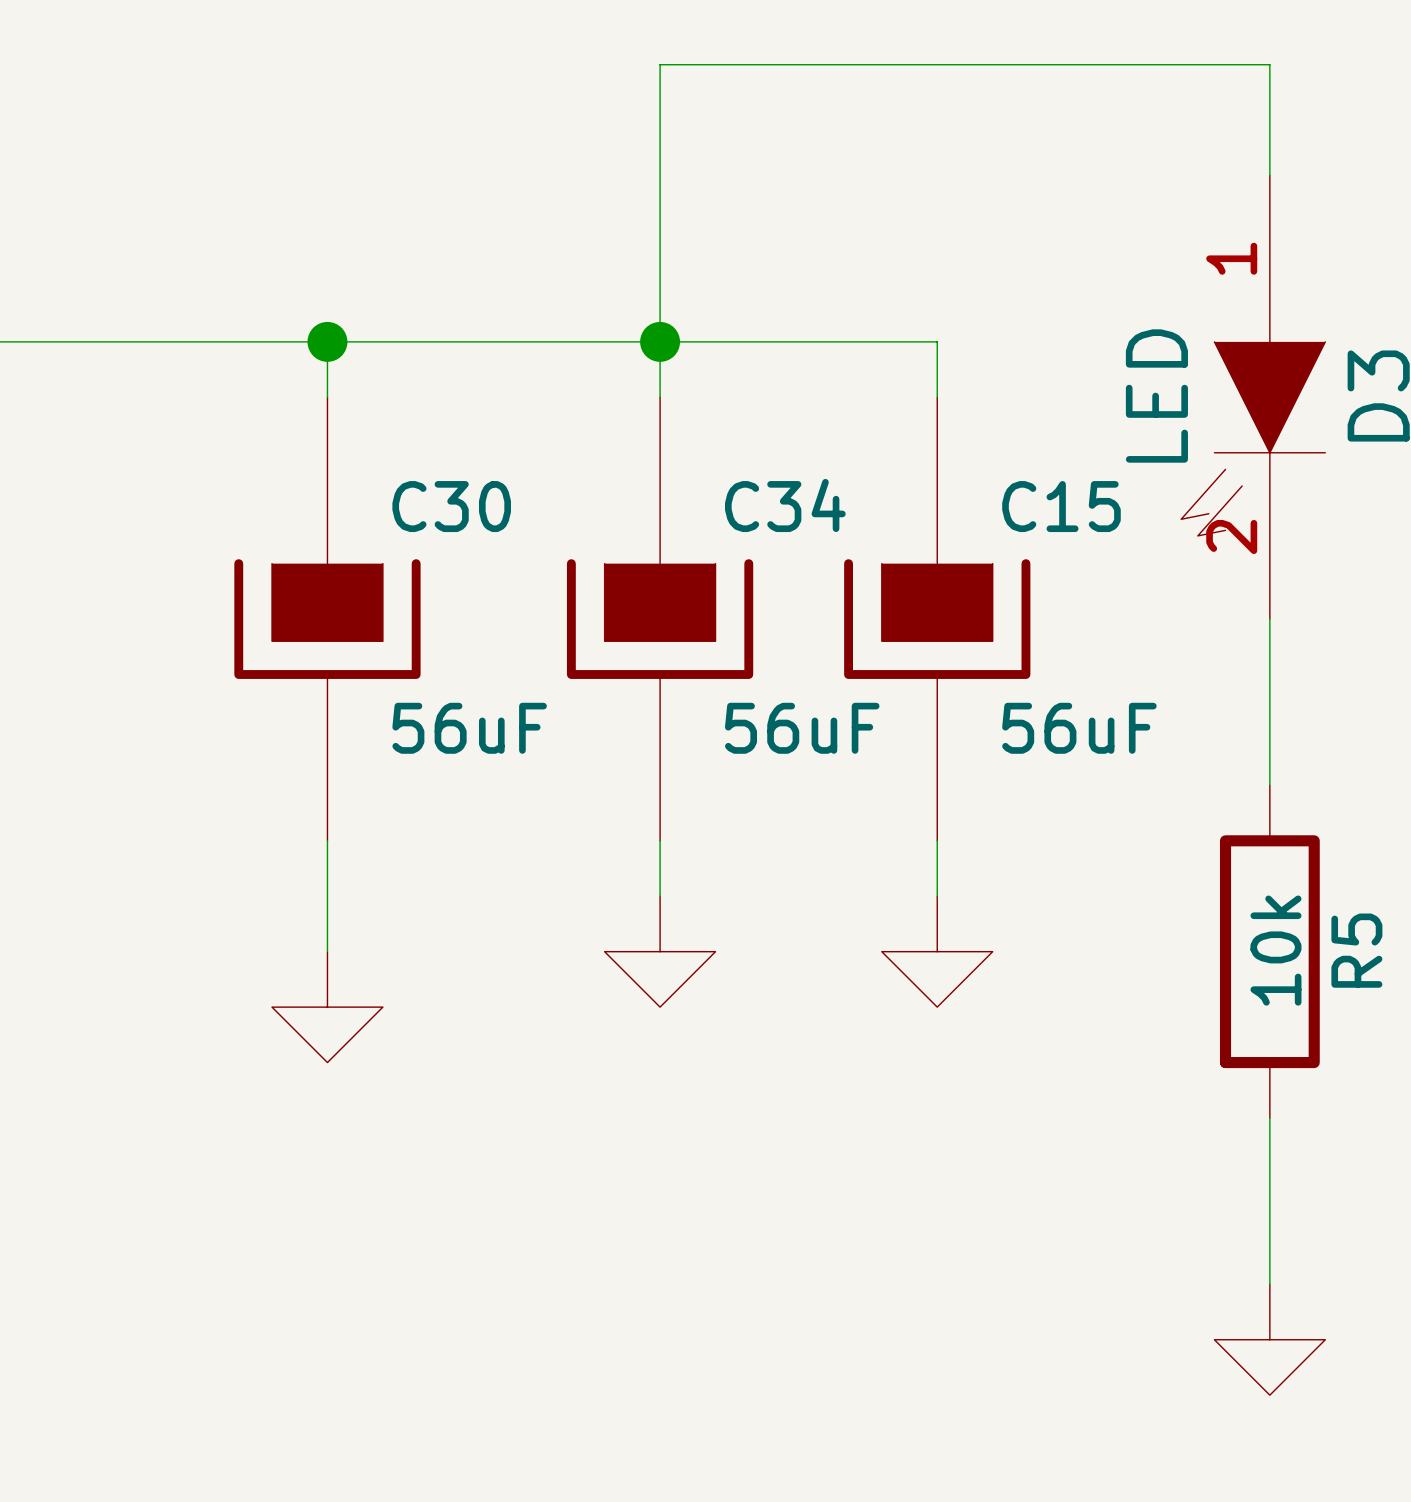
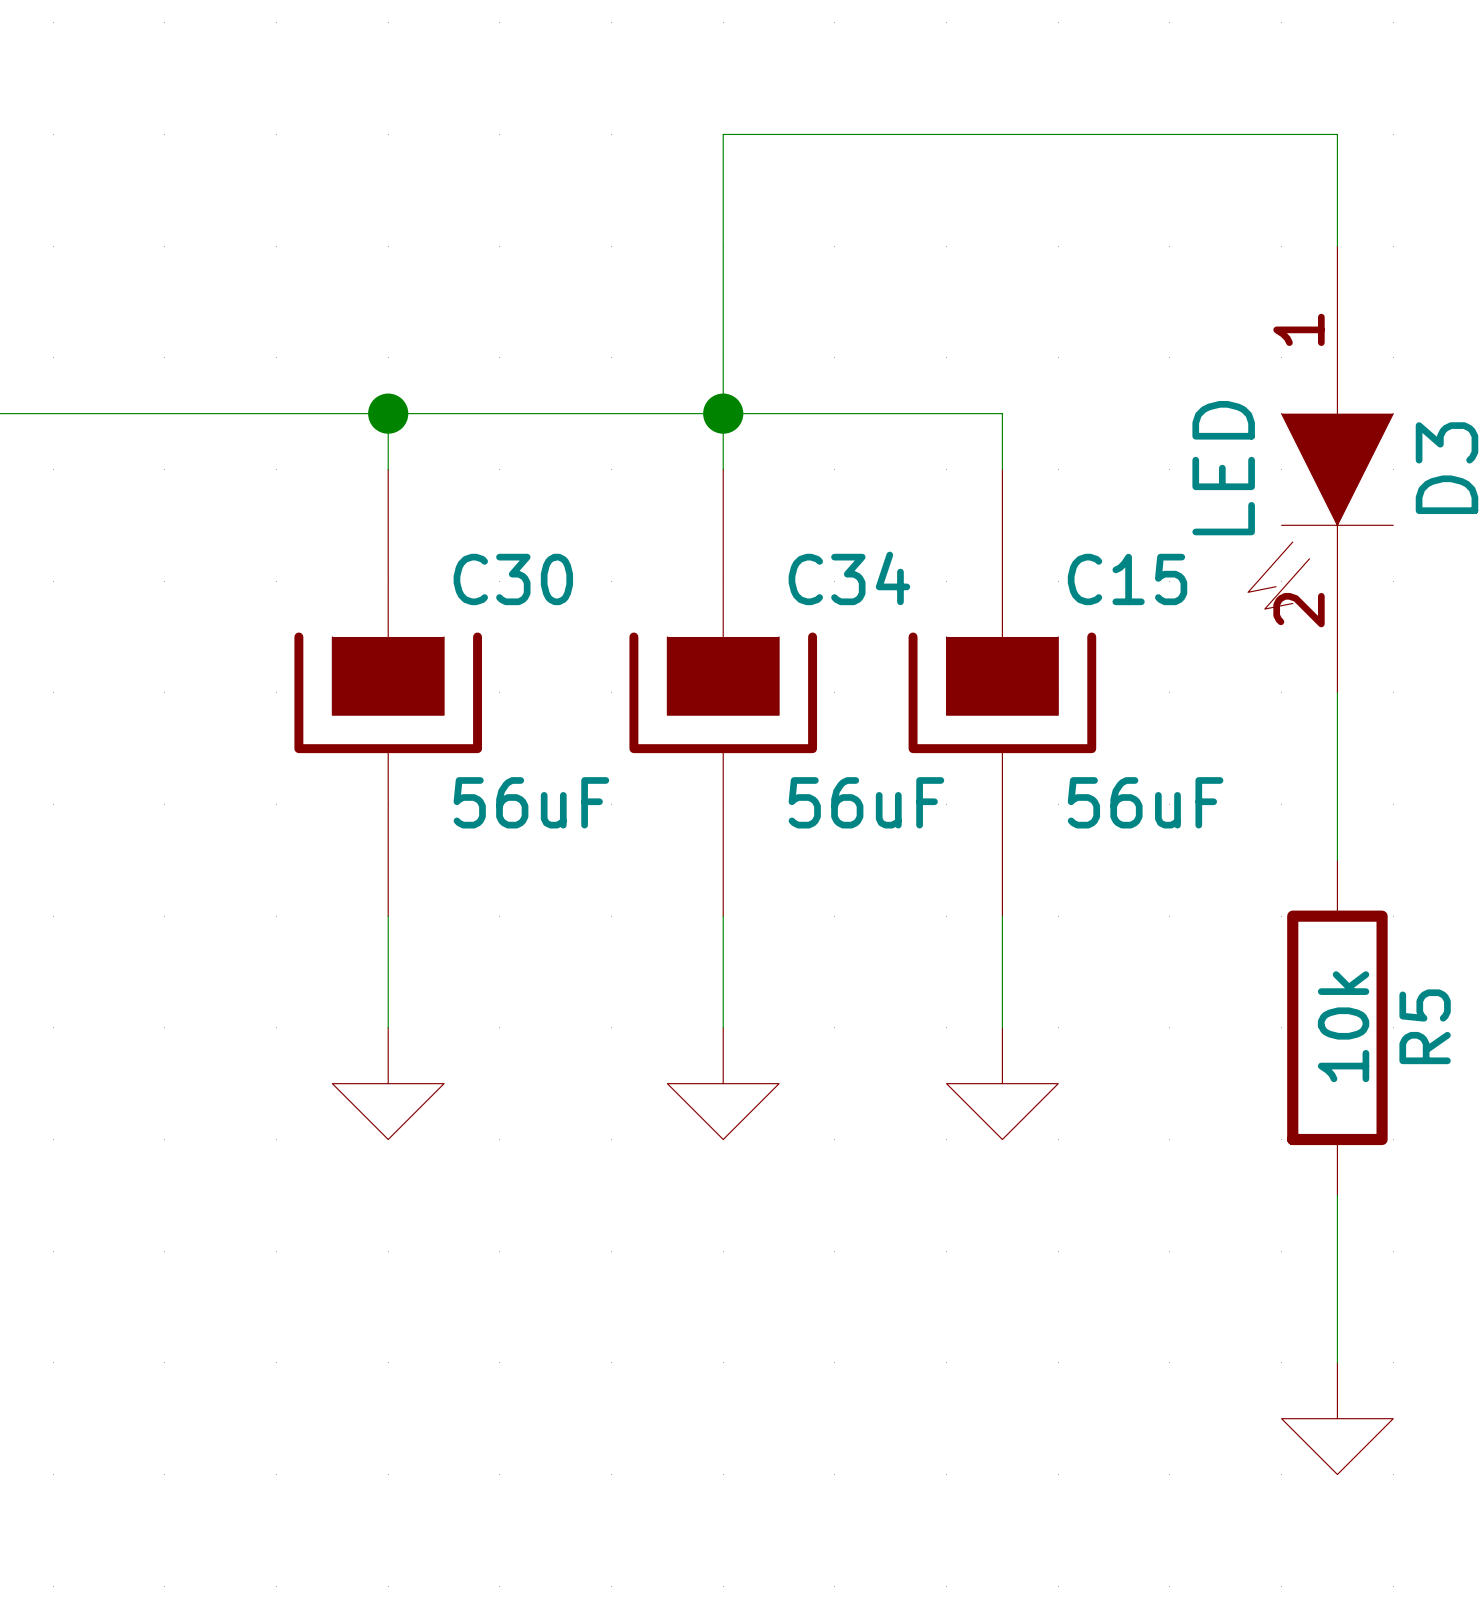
power symbol position: (660, 951) -> (723, 1083)
power symbol position: (937, 951) -> (1002, 1083)

